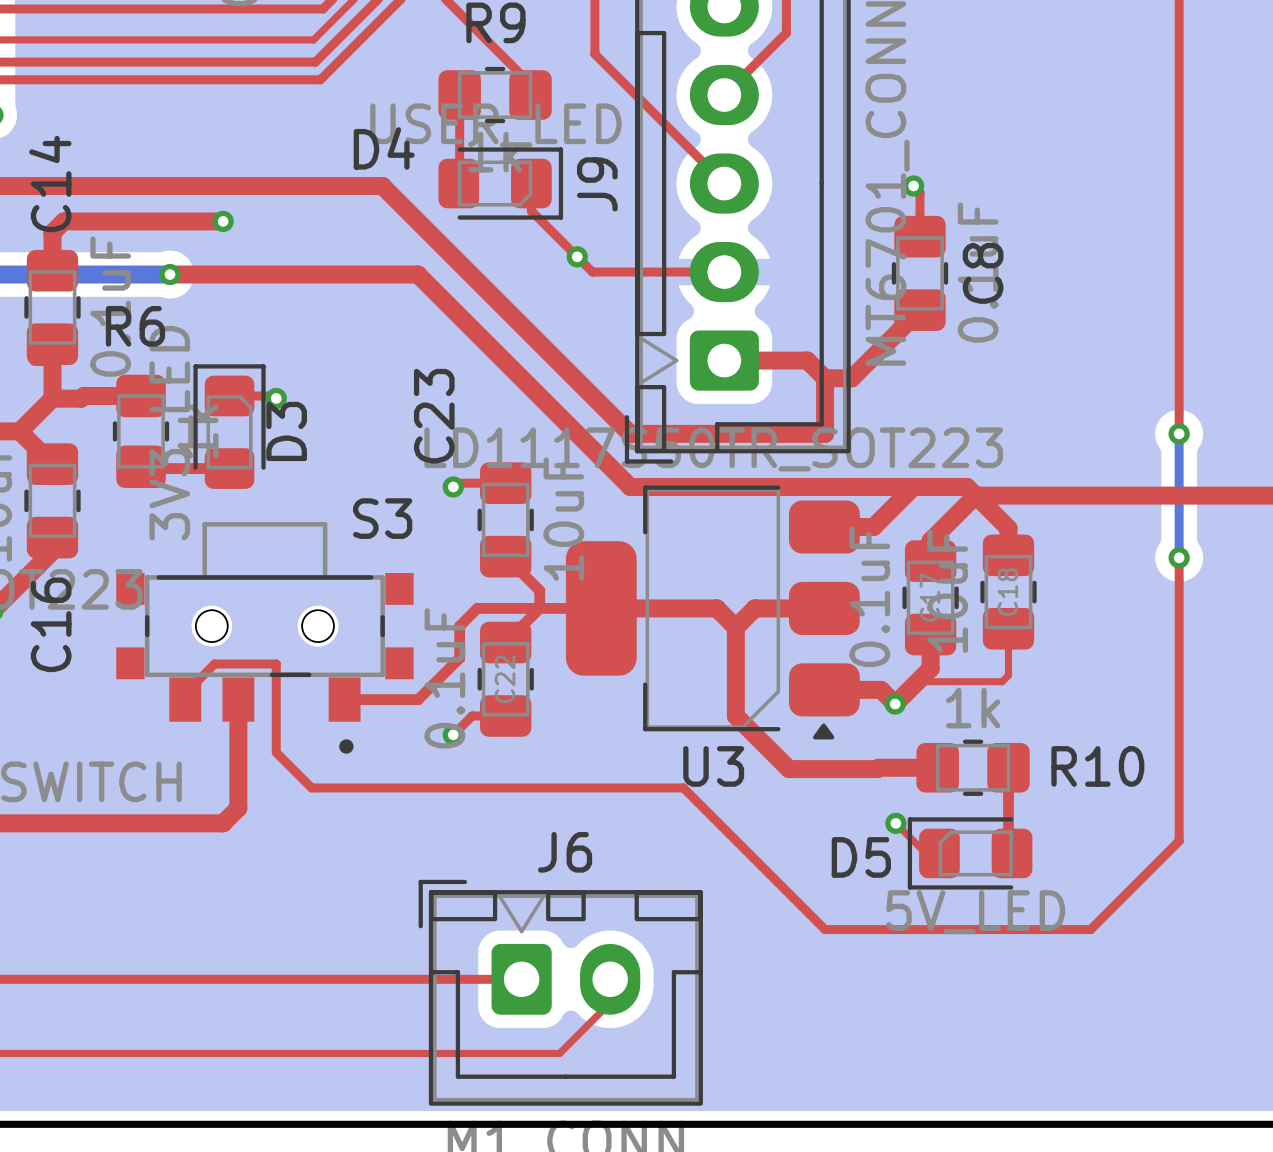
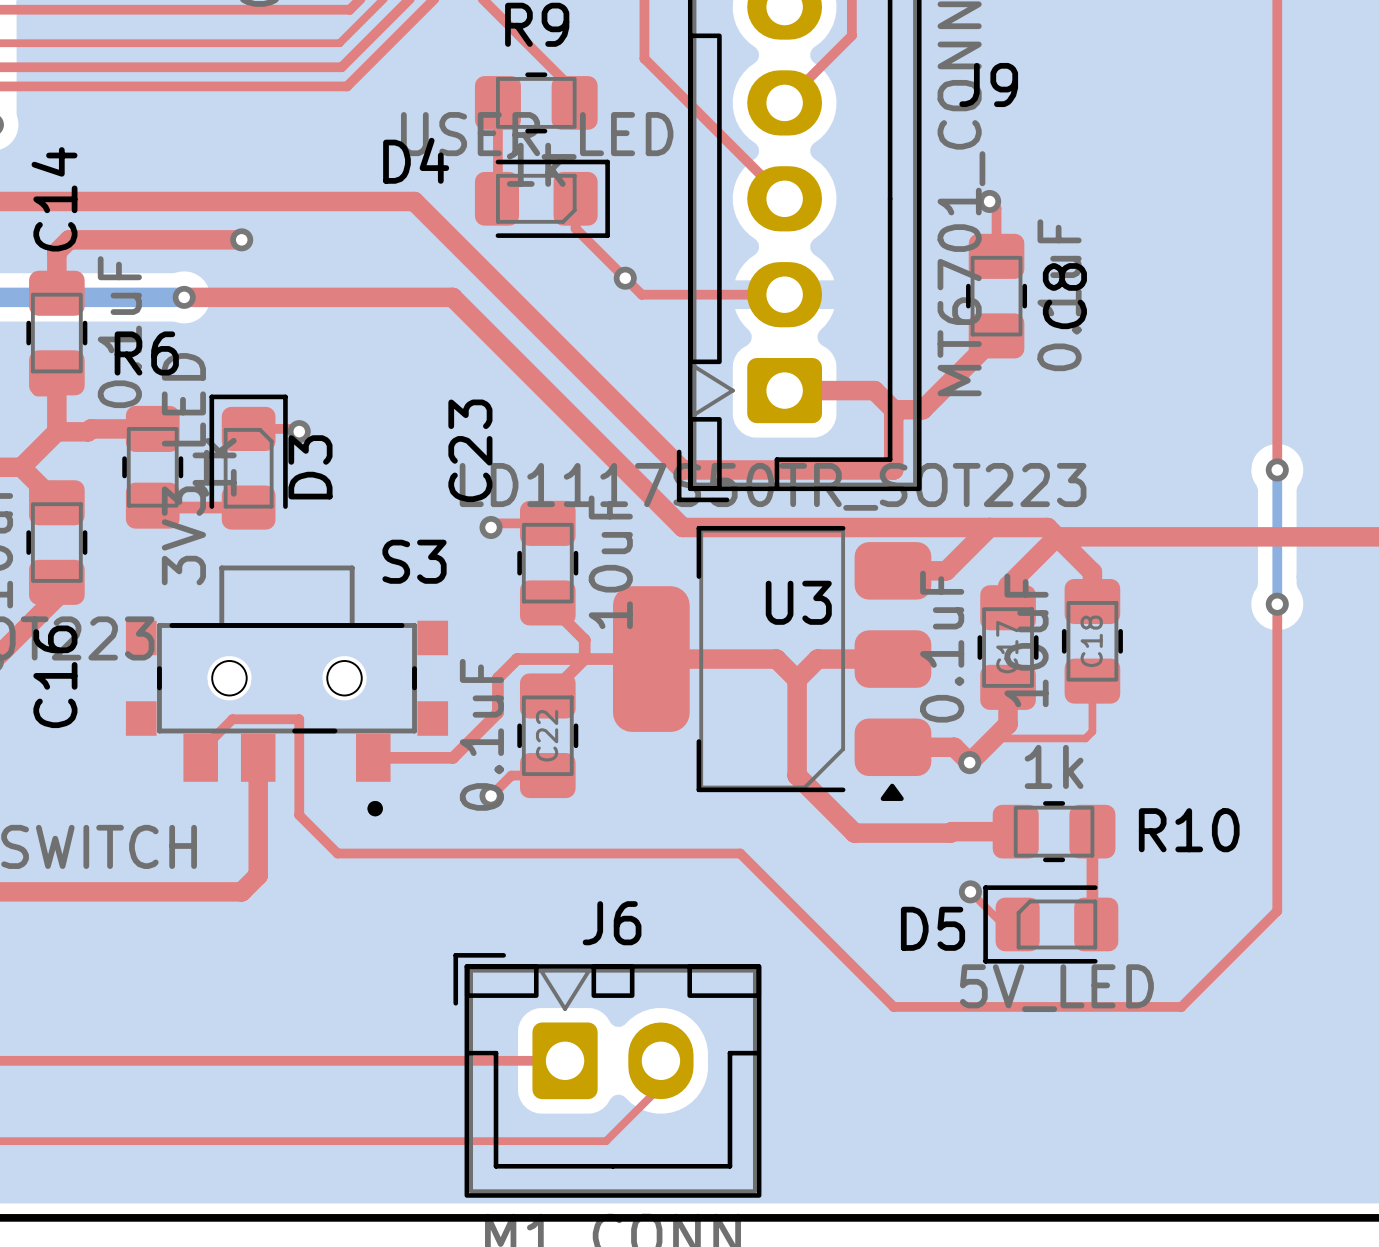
J9 name rotation: 0° (597, 184) -> 90° clockwise (988, 85)
J9 name position: J9 (597, 184) -> J9 (988, 85)
U3 name position: U3 (713, 766) -> U3 (798, 602)

